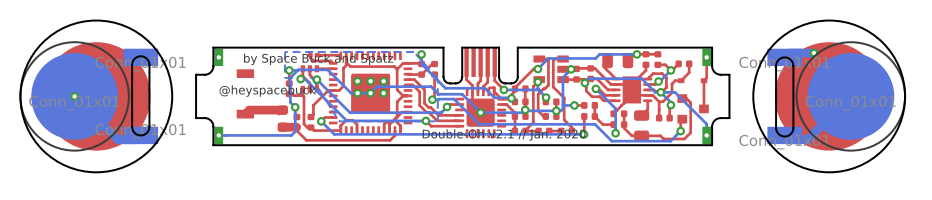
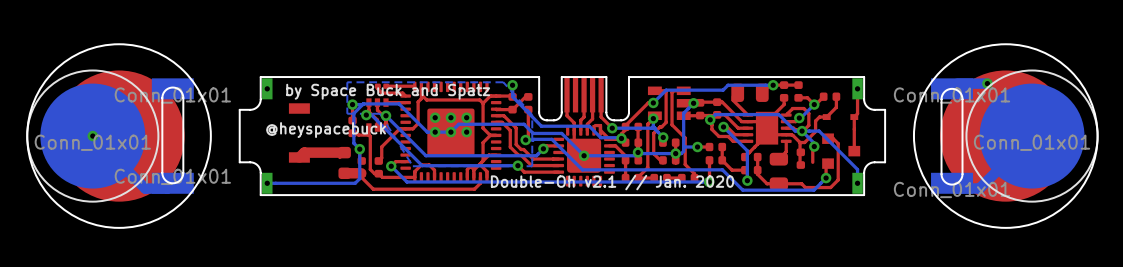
part rotation: 0° (664, 118) -> 90° clockwise (800, 158)

